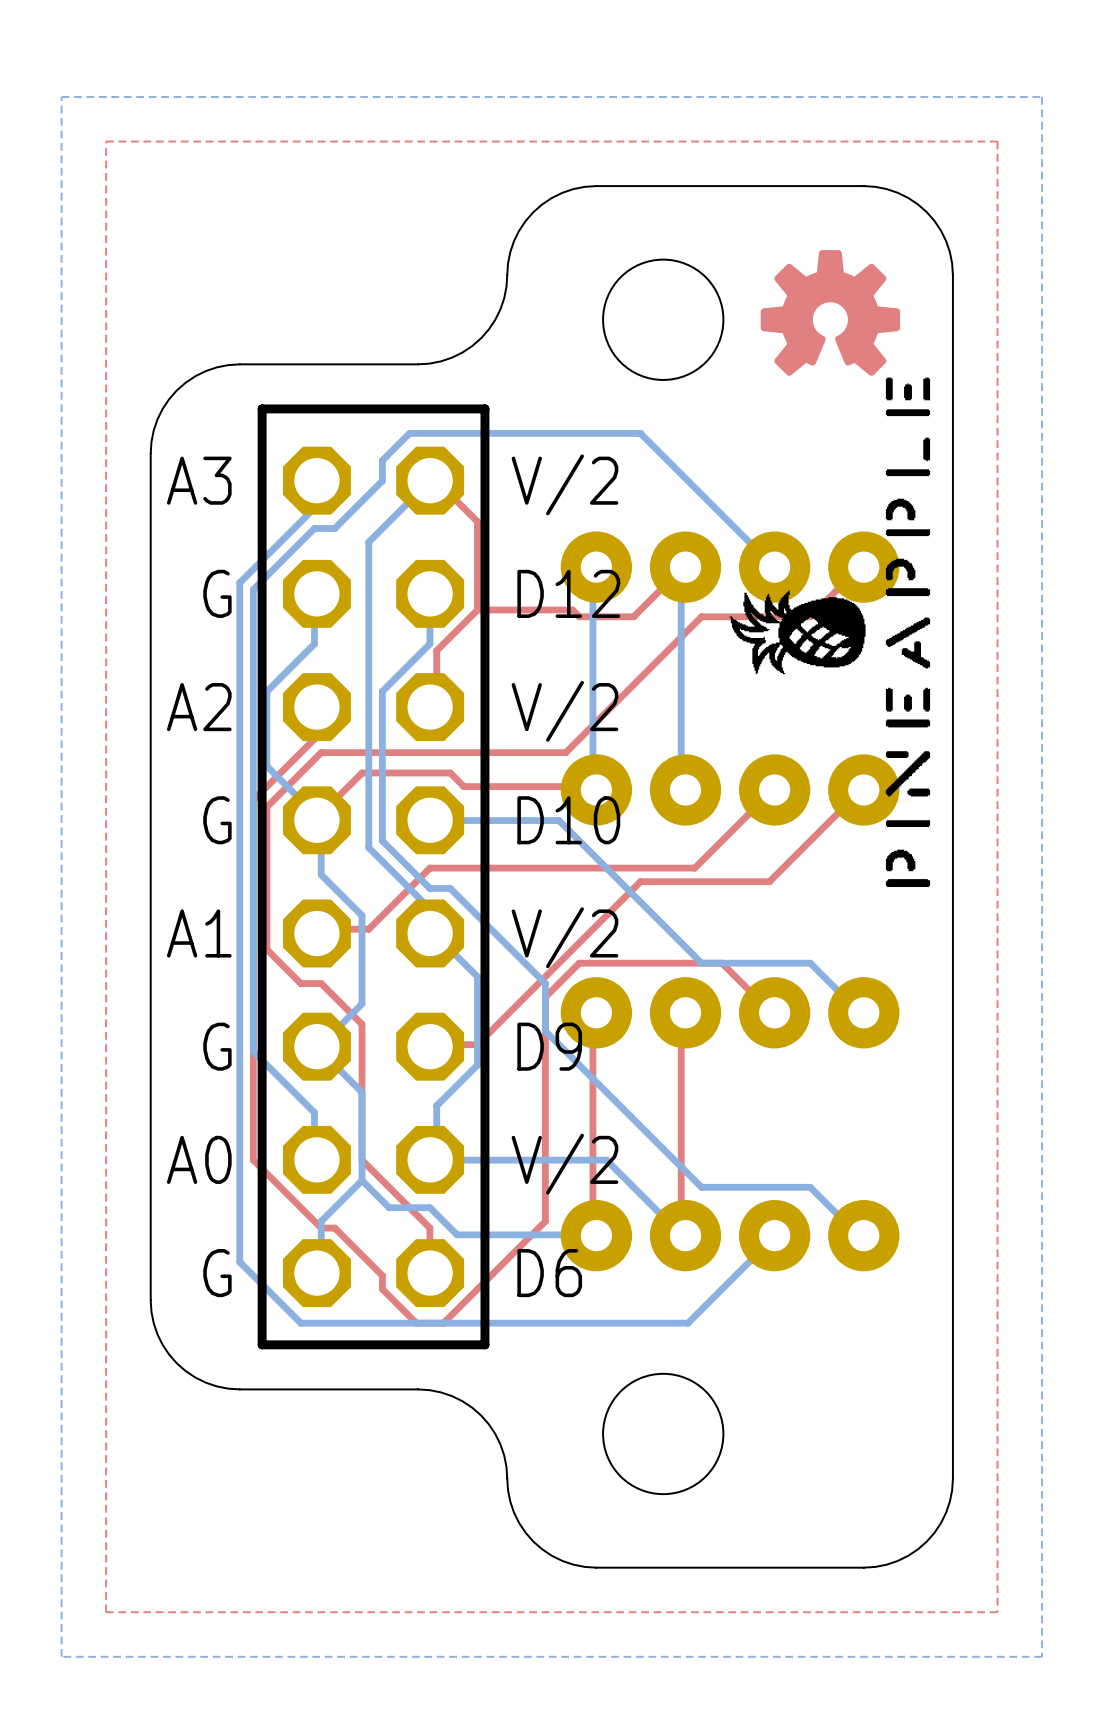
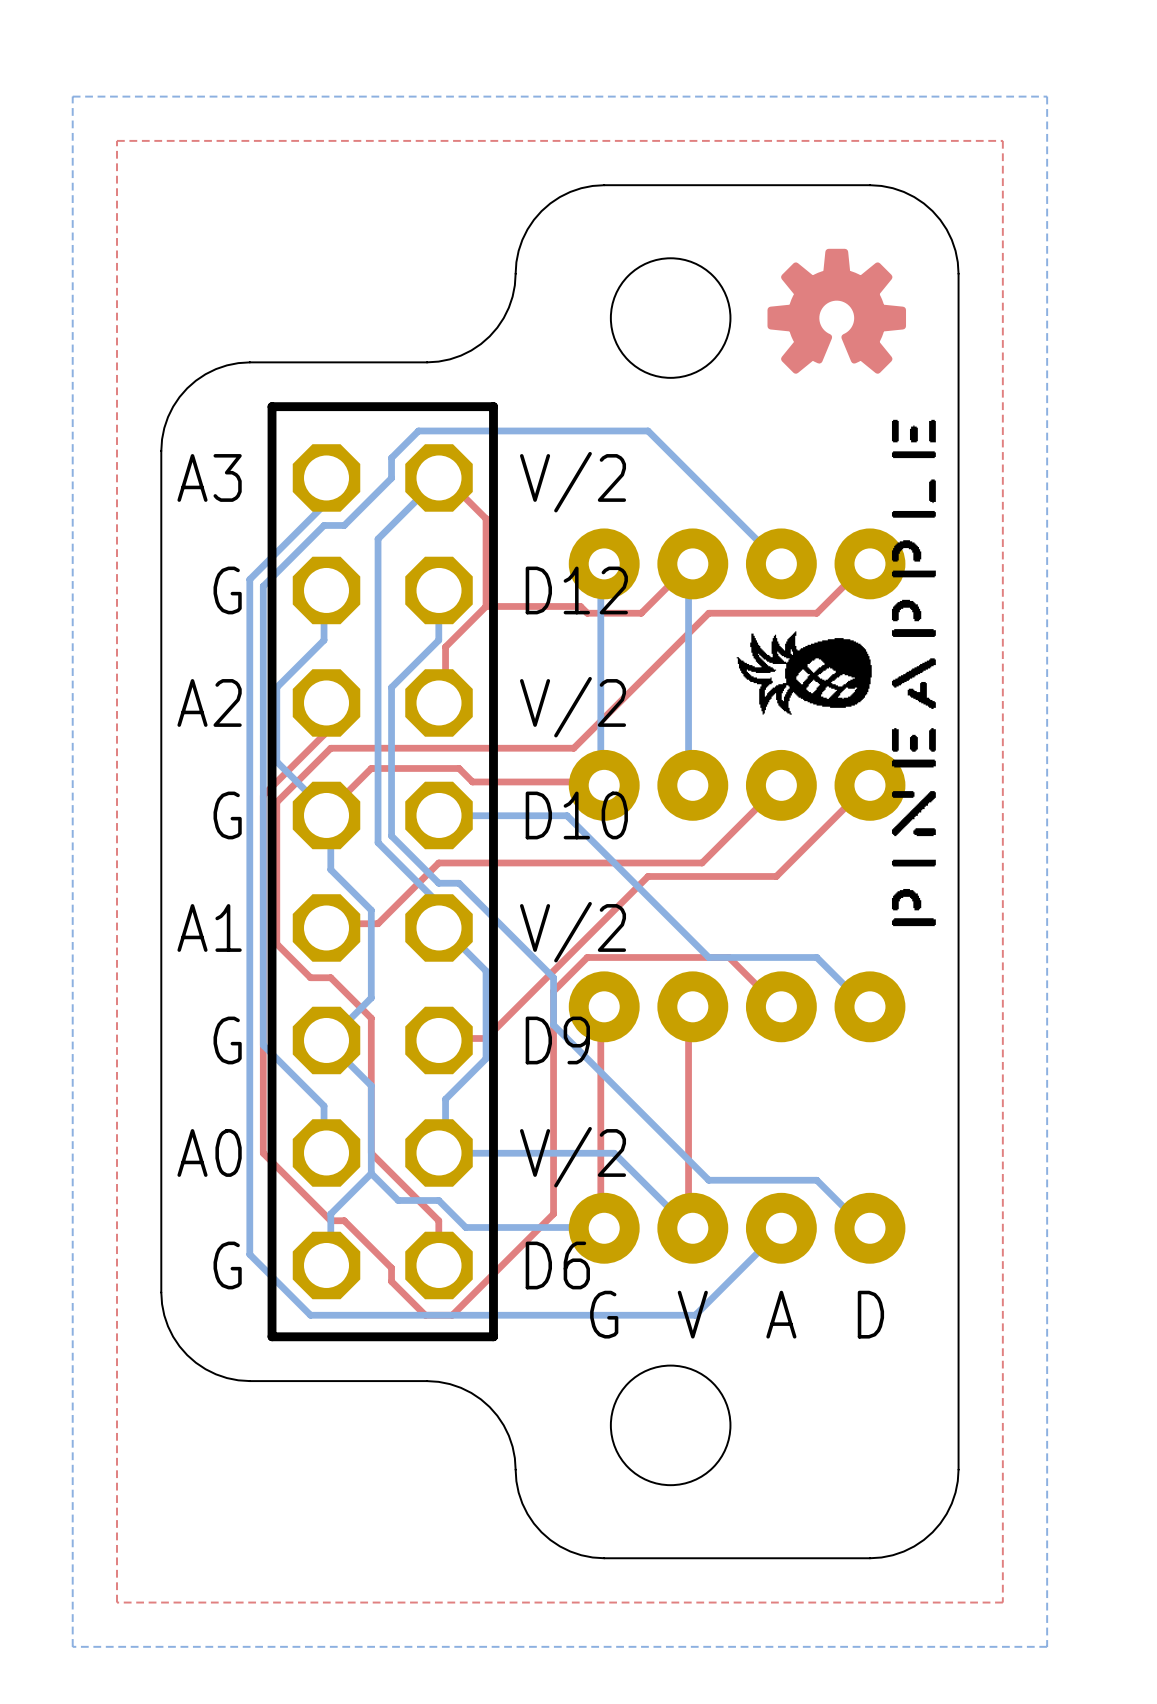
drawing position: (829, 632) -> (836, 672)
text: none -> G (604, 1314)
text: none -> V (692, 1314)
text: none -> A (781, 1314)
text: none -> D (870, 1314)

